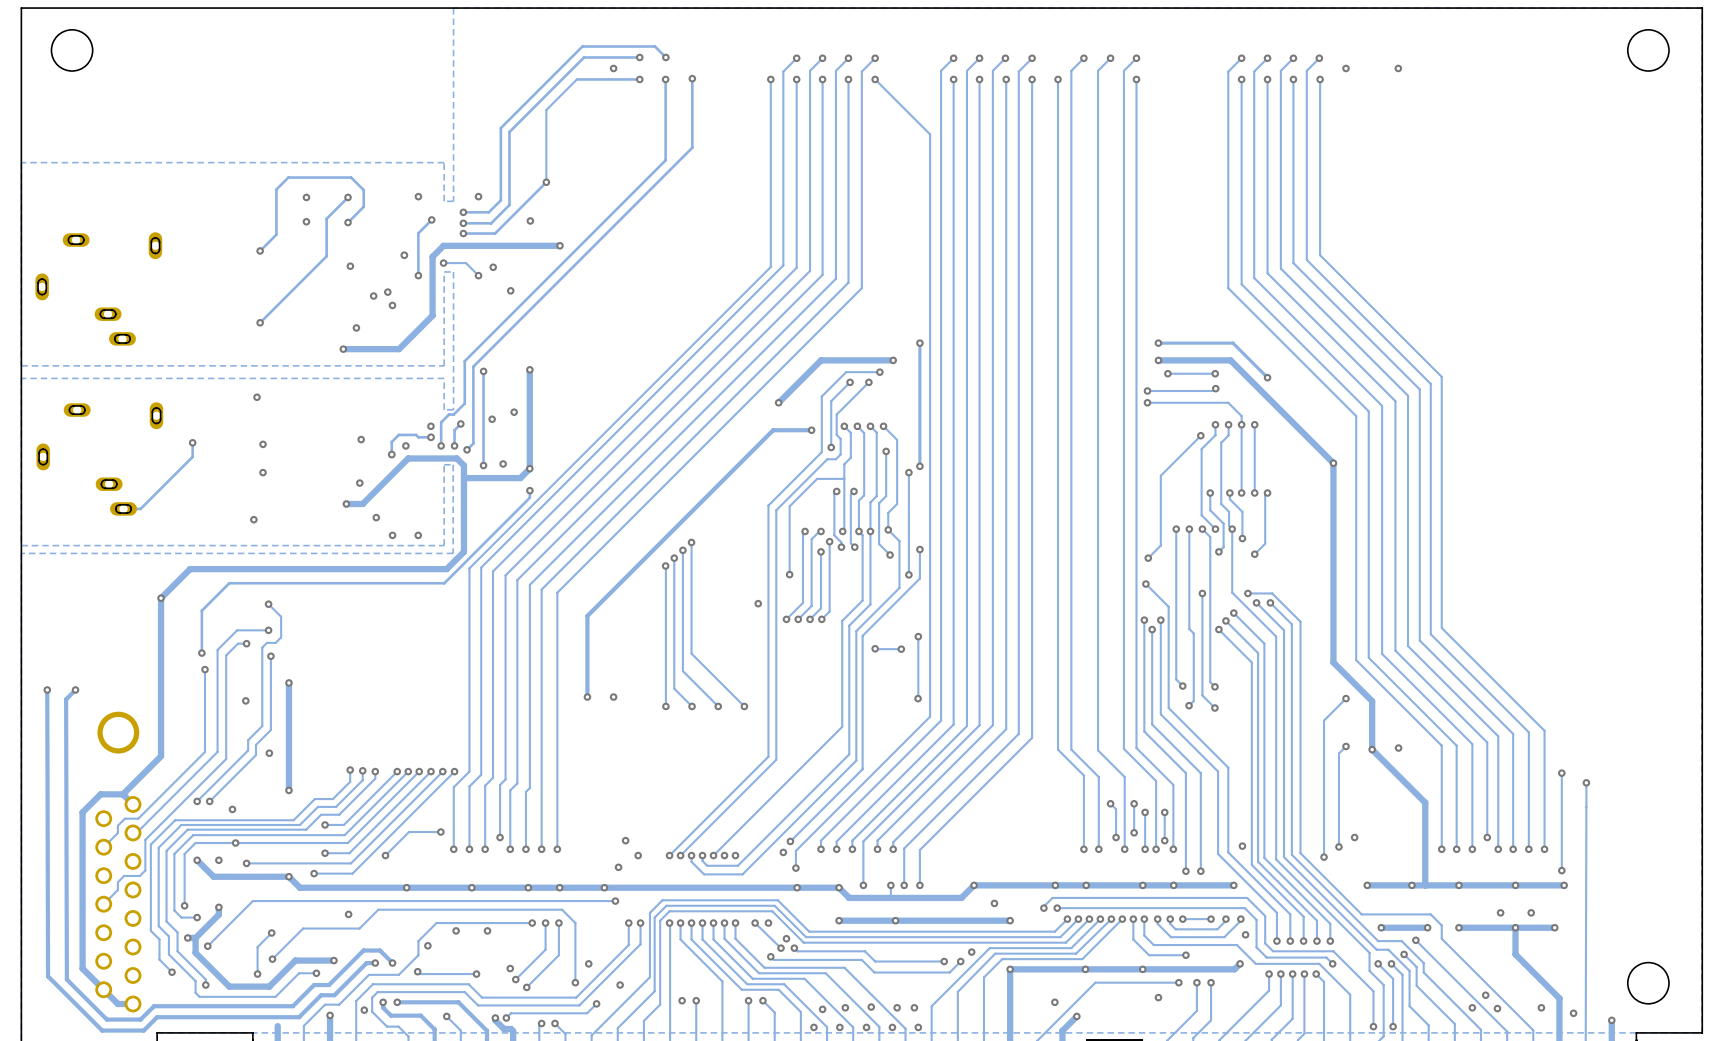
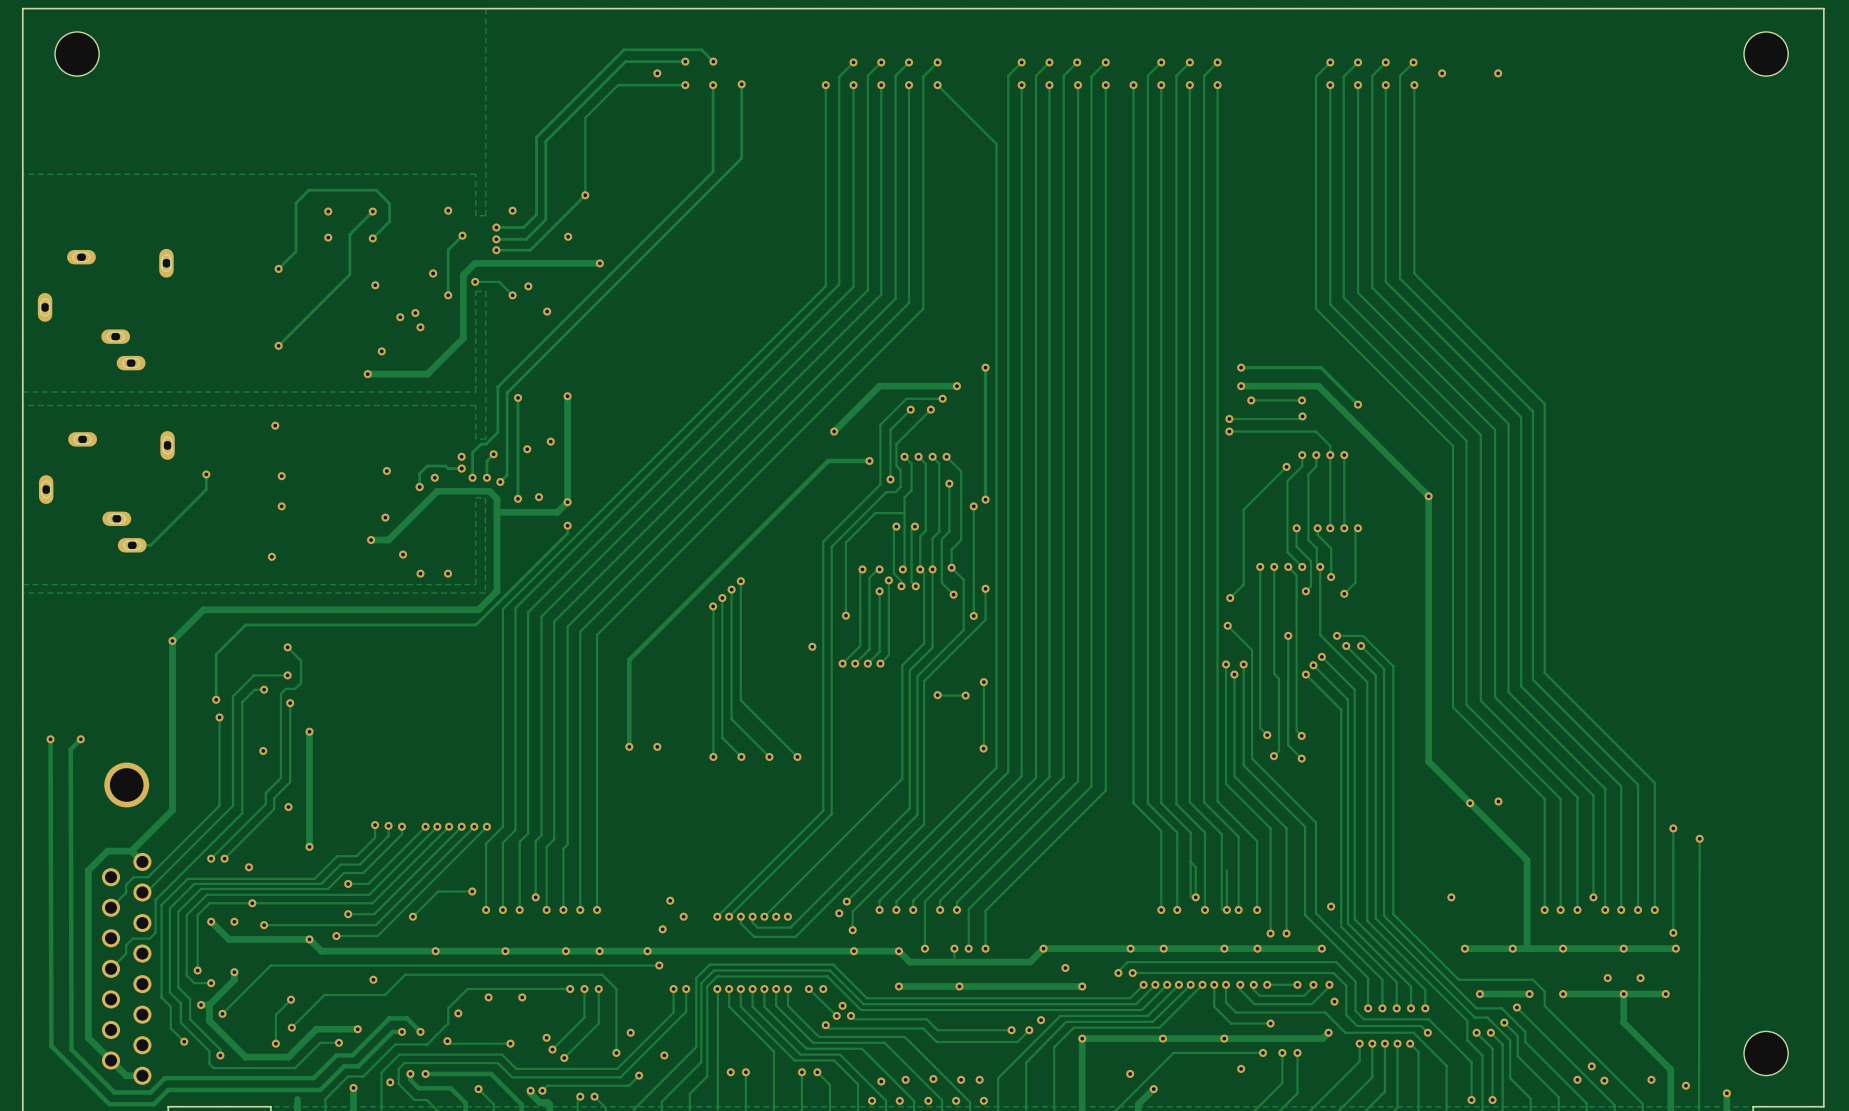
track: none -> (1161, 85) (1161, 803) (1190, 832) (1190, 897)
via: none -> (1161, 85)
track: none -> (1189, 85) (1189, 802) (1221, 834) (1221, 909)
via: none -> (1189, 85)
track: (1333, 662) (1372, 701) (1372, 749) -> (1428, 709) (1428, 761) (1470, 803)
track: (1346, 698) (1324, 720) (1324, 857) -> none
via: (1346, 698) -> none
track: (1346, 746) (1338, 753) (1338, 846) -> none
via: (1346, 746) -> none
via: (1110, 803) -> none
track: (1134, 803) (1134, 832) -> none
via: (1134, 803) -> none
via: (1145, 812) -> none
track: (1164, 812) (1164, 840) -> none
via: (1164, 812) -> none
via: (1134, 832) -> none
via: (1164, 840) -> none
via: (1338, 846) -> none
via: (1324, 857) -> none

